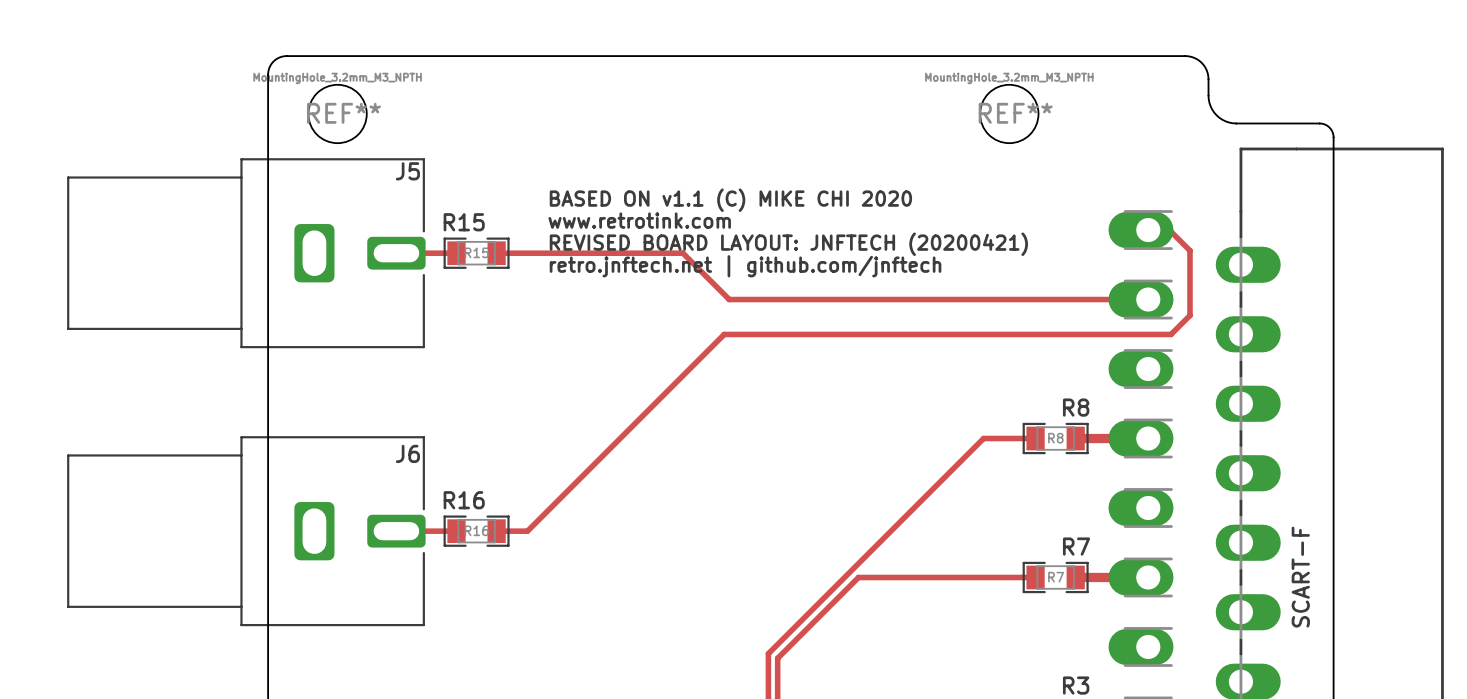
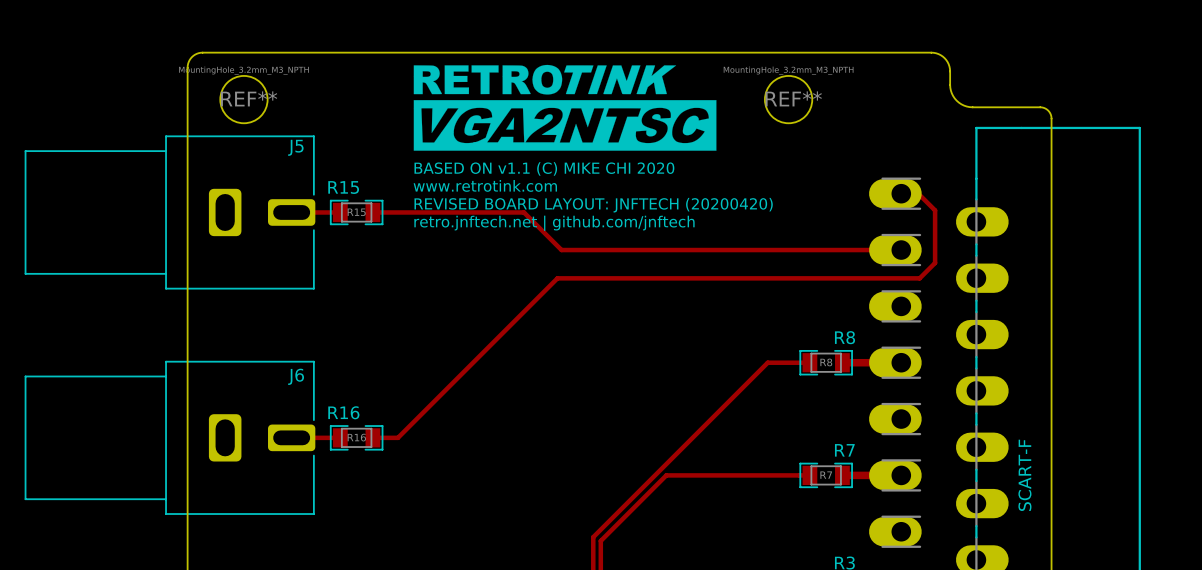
drawing: none -> [413, 64, 717, 151]
text: REVISED BOARD LAYOUT: JNFTECH (20200421) (788, 244) -> REVISED BOARD LAYOUT: JNFTECH (20200420) (593, 205)

